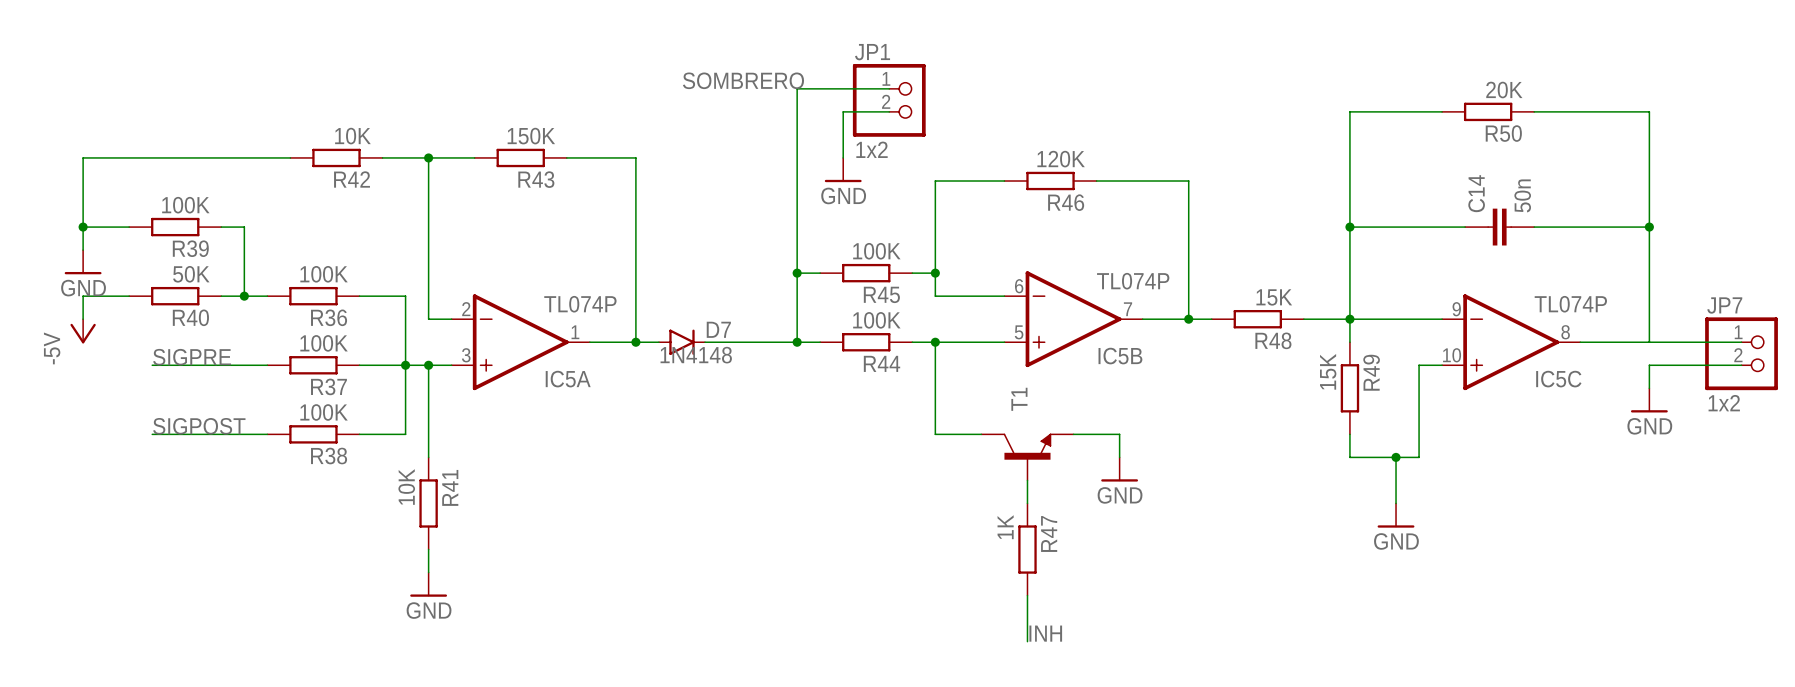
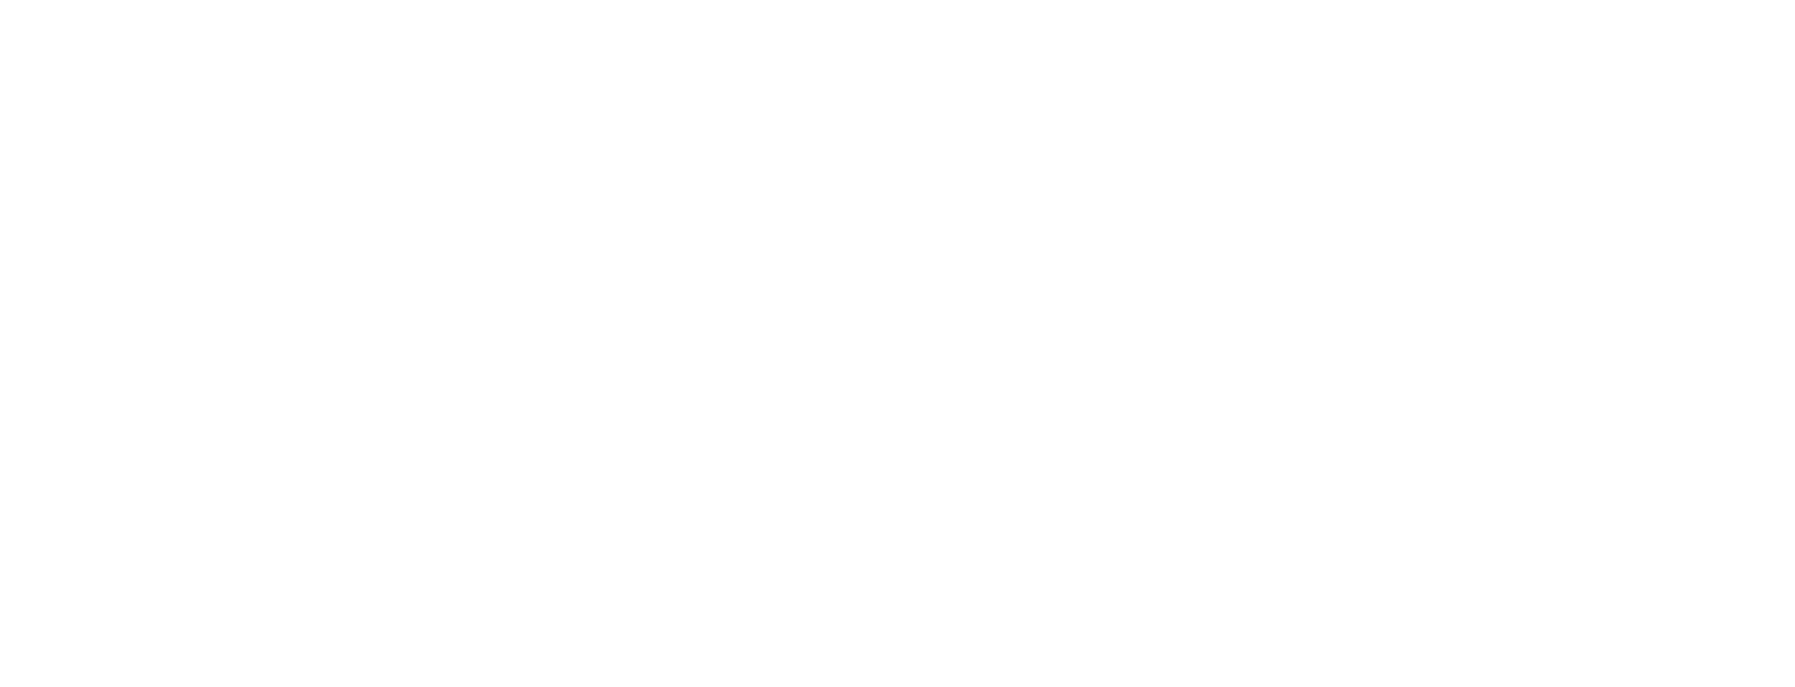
label: SOMBRERO (743, 80) -> none
wire: (889, 88) (797, 88) (797, 342) -> none
JP1: 1x2 (889, 100) -> none
wire: (889, 111) (843, 111) (843, 157) -> none
wire: (1442, 111) (1349, 111) (1349, 342) -> none
R50: 20K (1488, 111) -> none
wire: (1534, 111) (1649, 111) (1649, 342) -> none
wire: (290, 157) (83, 157) (83, 250) -> none
R42: 10K (336, 157) -> none
wire: (382, 157) (474, 157) -> none
wire: (428, 157) (428, 319) (451, 319) -> none
junction: (428, 157) -> none
R43: 150K (520, 157) -> none
wire: (566, 157) (635, 157) (635, 342) -> none
power symbol: GND (843, 170) -> none
wire: (1004, 181) (935, 181) (935, 296) (1004, 296) -> none
R46: 120K (1050, 181) -> none
wire: (1096, 181) (1188, 181) (1188, 319) -> none
wire: (83, 227) (129, 227) -> none
junction: (83, 227) -> none
R39: 100K (175, 227) -> none
wire: (221, 227) (244, 227) (244, 296) -> none
wire: (1349, 227) (1465, 227) -> none
junction: (1349, 227) -> none
C14: 50n (1499, 227) -> none
wire: (1534, 227) (1649, 227) -> none
junction: (1649, 227) -> none
power symbol: GND (83, 262) -> none
wire: (797, 273) (820, 273) -> none
junction: (797, 273) -> none
R45: 100K (866, 273) -> none
wire: (912, 273) (935, 273) -> none
junction: (935, 273) -> none
wire: (129, 296) (83, 296) (83, 319) -> none
R40: 50K (175, 296) -> none
wire: (221, 296) (267, 296) -> none
junction: (244, 296) -> none
R36: 100K (313, 296) -> none
wire: (359, 296) (405, 296) (405, 434) (359, 434) -> none
IC5B: TL074P (1073, 319) -> none
wire: (1142, 319) (1211, 319) -> none
junction: (1188, 319) -> none
R48: 15K (1257, 319) -> none
wire: (1303, 319) (1442, 319) -> none
junction: (1349, 319) -> none
power symbol: -5V (83, 331) -> none
IC5A: TL074P (520, 342) -> none
wire: (589, 342) (658, 342) -> none
junction: (635, 342) -> none
D7: 1N4148 (681, 342) -> none
wire: (705, 342) (820, 342) -> none
junction: (797, 342) -> none
R44: 100K (866, 342) -> none
wire: (912, 342) (1004, 342) -> none
wire: (935, 342) (935, 434) (981, 434) -> none
junction: (935, 342) -> none
IC5C: TL074P (1511, 342) -> none
wire: (1580, 342) (1741, 342) -> none
JP7: 1x2 (1741, 353) -> none
label: SIGPRE (192, 357) -> none
wire: (152, 365) (267, 365) -> none
R37: 100K (313, 365) -> none
wire: (359, 365) (451, 365) -> none
junction: (405, 365) -> none
wire: (428, 365) (428, 457) -> none
junction: (428, 365) -> none
wire: (1442, 365) (1419, 365) (1419, 457) (1349, 457) (1349, 434) -> none
wire: (1741, 365) (1649, 365) (1649, 388) -> none
R49: 15K (1349, 388) -> none
power symbol: GND (1649, 400) -> none
label: SIGPOST (199, 426) -> none
wire: (152, 434) (267, 434) -> none
R38: 100K (313, 434) -> none
wire: (1073, 434) (1119, 434) (1119, 457) -> none
T1: (1027, 457) -> none
wire: (1396, 457) (1396, 503) -> none
junction: (1396, 457) -> none
power symbol: GND (1119, 469) -> none
wire: (1027, 480) (1027, 503) -> none
R41: 10K (428, 503) -> none
power symbol: GND (1396, 515) -> none
wire: (428, 549) (428, 572) -> none
R47: 1K (1027, 549) -> none
power symbol: GND (428, 584) -> none
wire: (1027, 595) (1027, 641) -> none
label: INH (1045, 633) -> none

